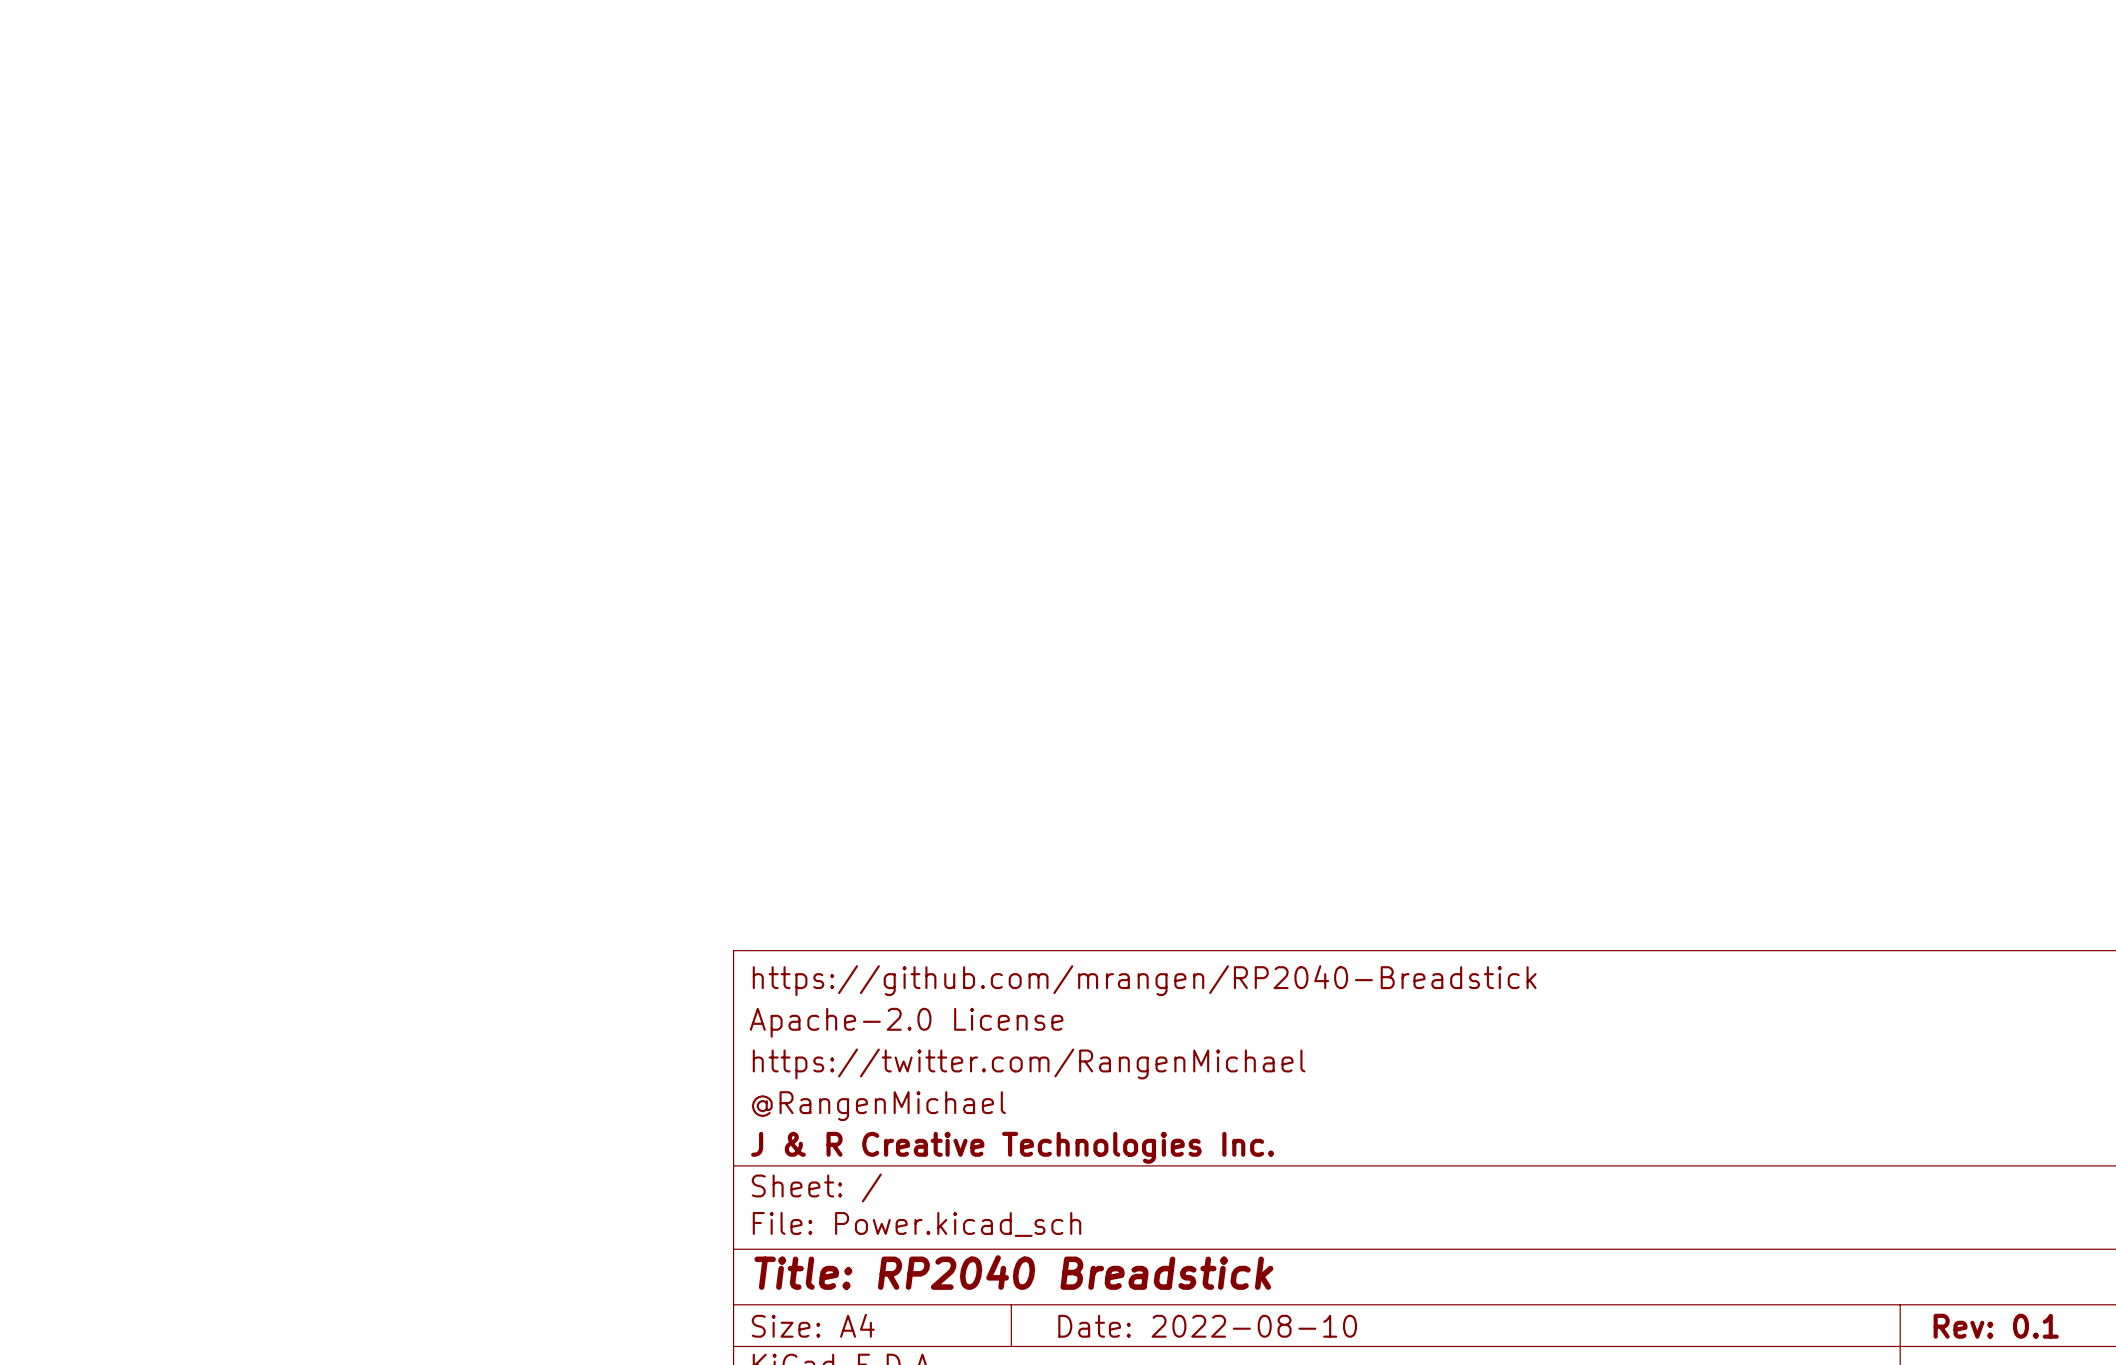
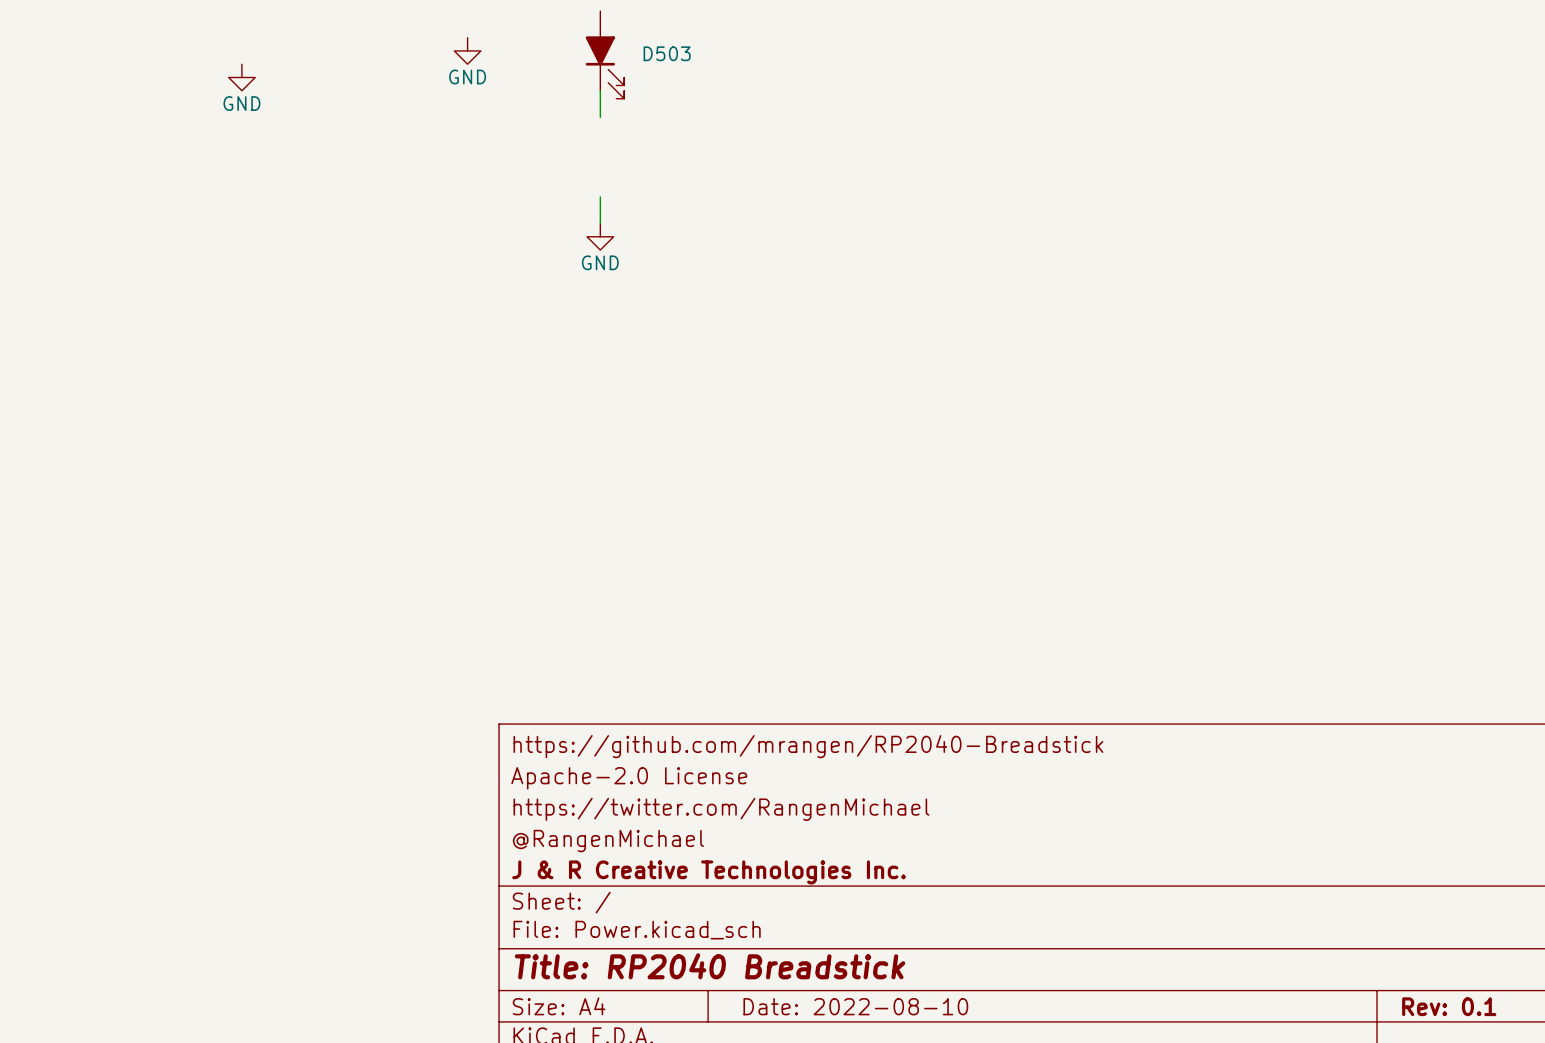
power symbol: none -> GND (467, 50)
D503: none -> (604, 54)
power symbol: none -> GND (241, 77)
wire: none -> (600, 90) (600, 117)
wire: none -> (600, 196) (600, 223)
power symbol: none -> GND (600, 236)

